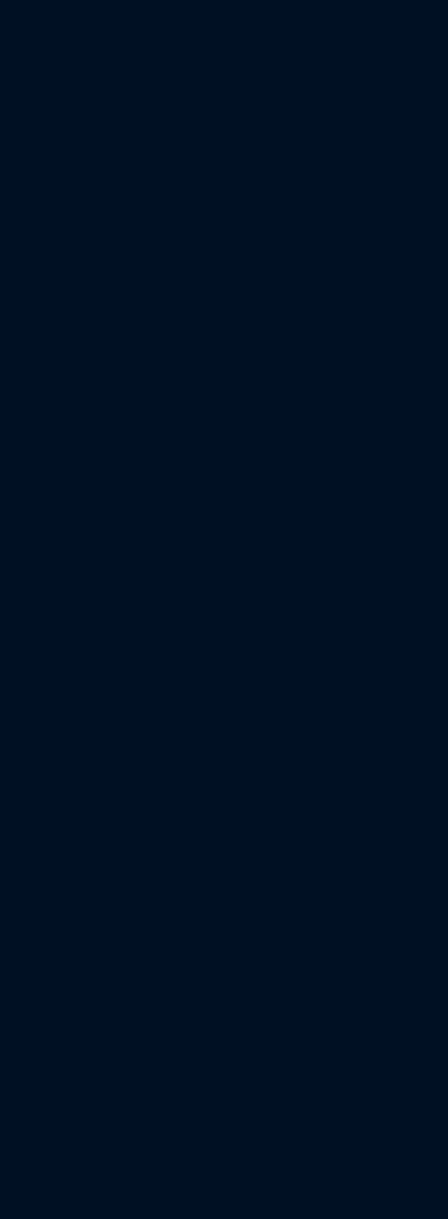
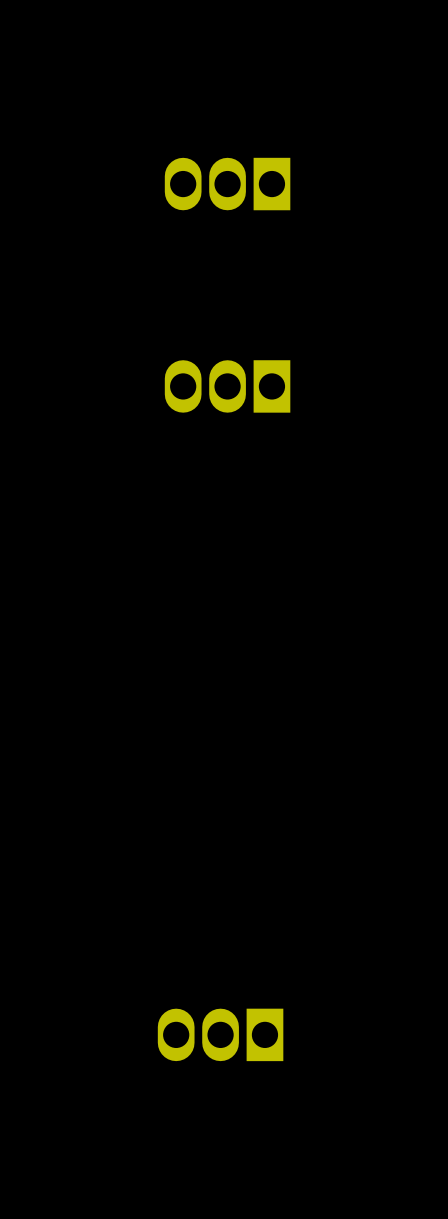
part: none -> (227, 184)
part: none -> (227, 386)
part: none -> (220, 1034)

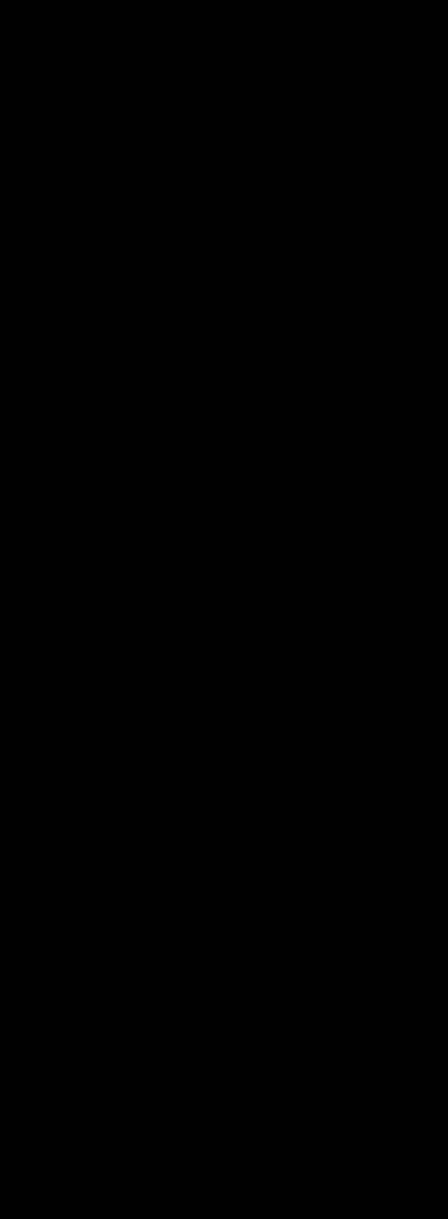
part: (227, 184) -> none
part: (227, 386) -> none
part: (220, 1034) -> none

